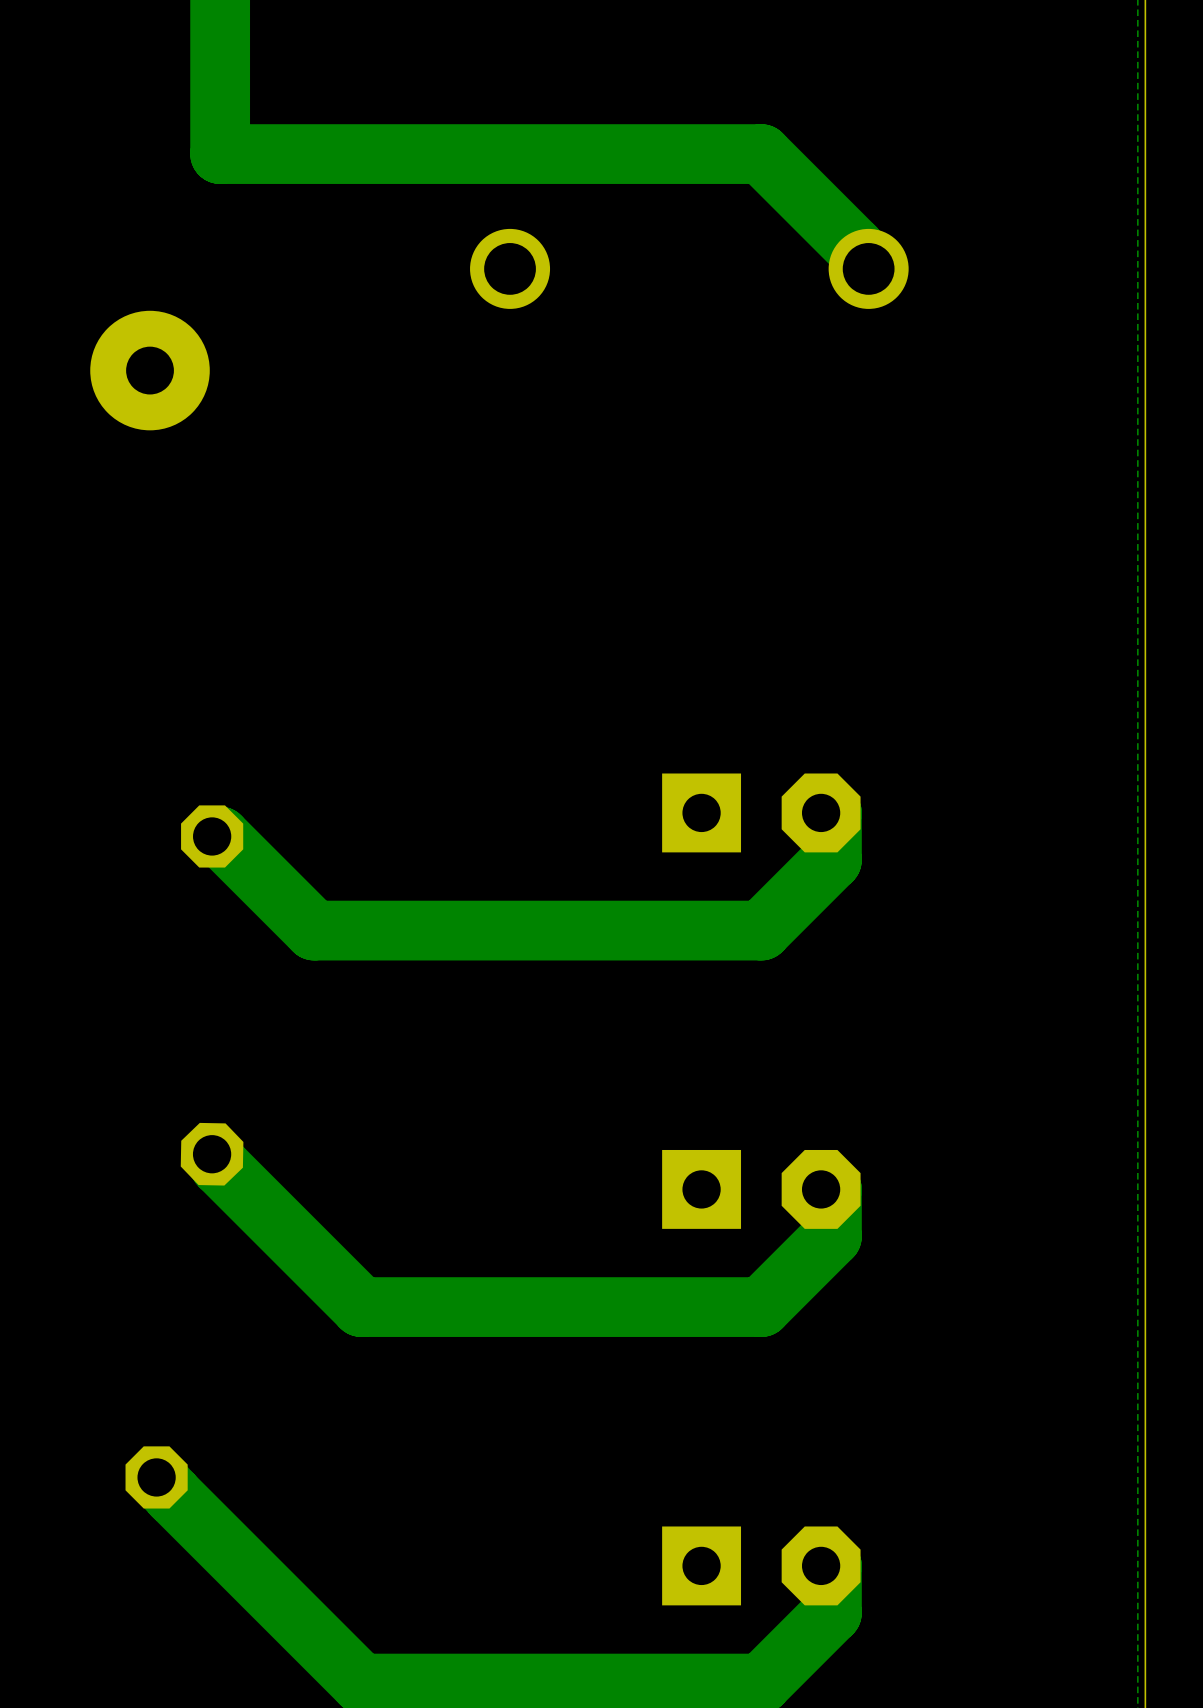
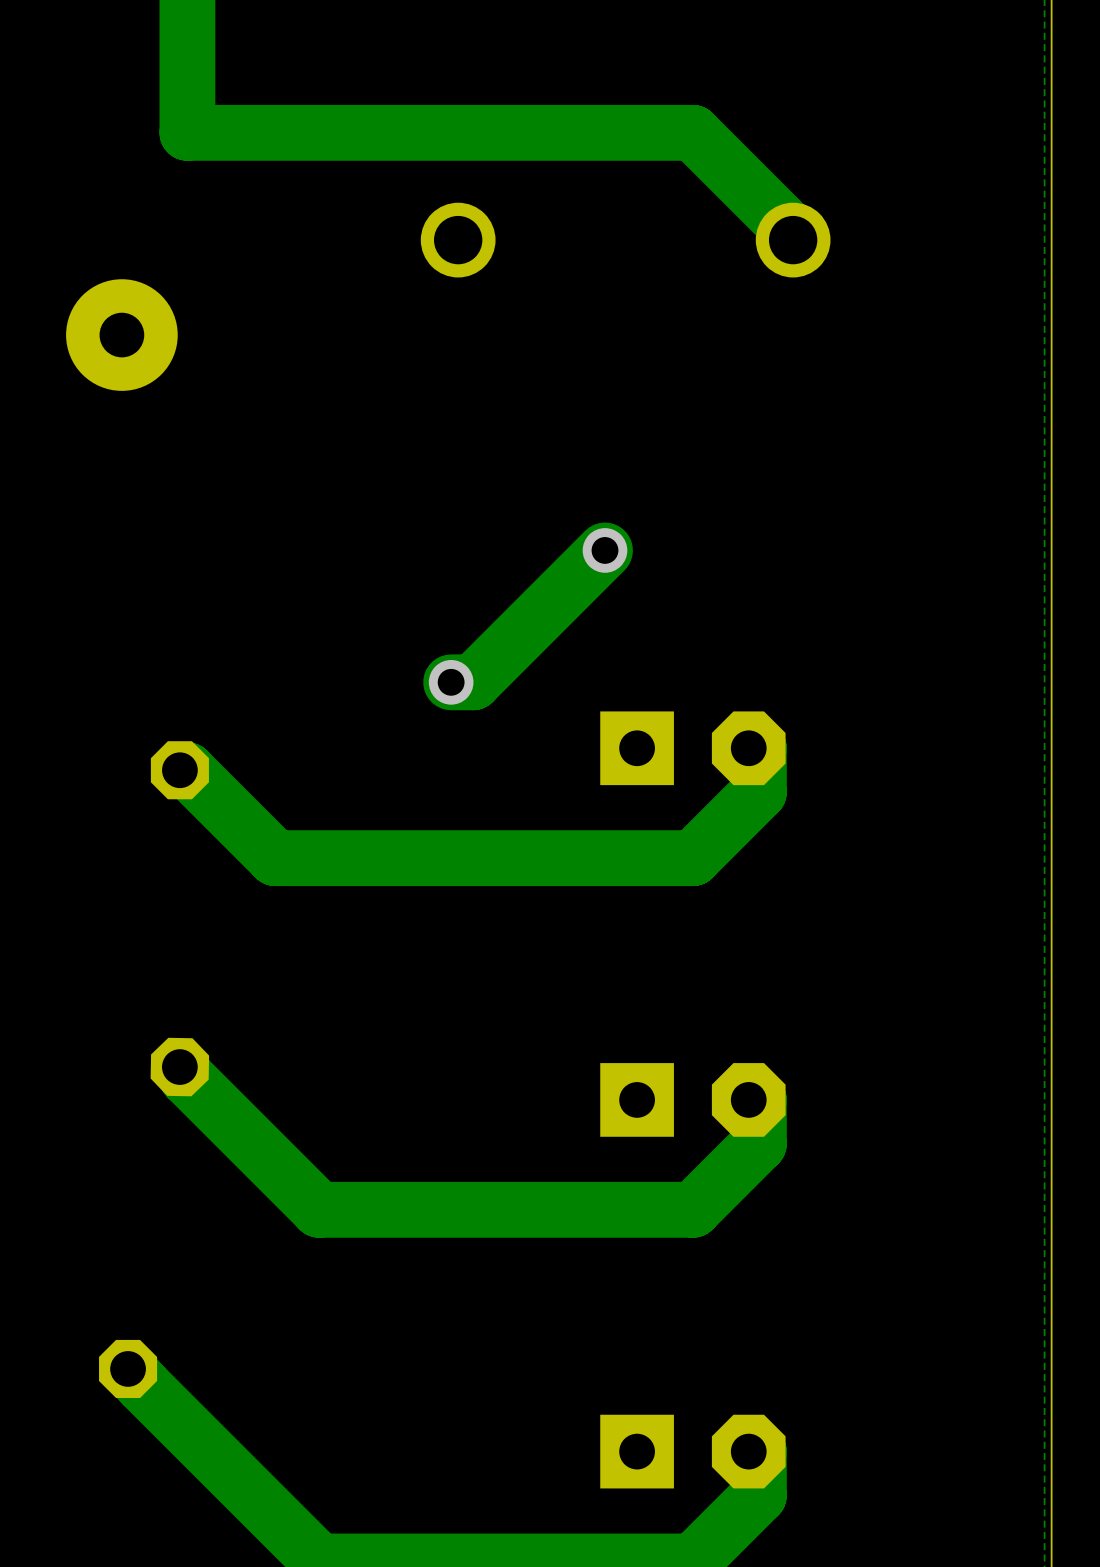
track: none -> (605, 550) (473, 682) (451, 682)
via: none -> (605, 550)
via: none -> (451, 682)

